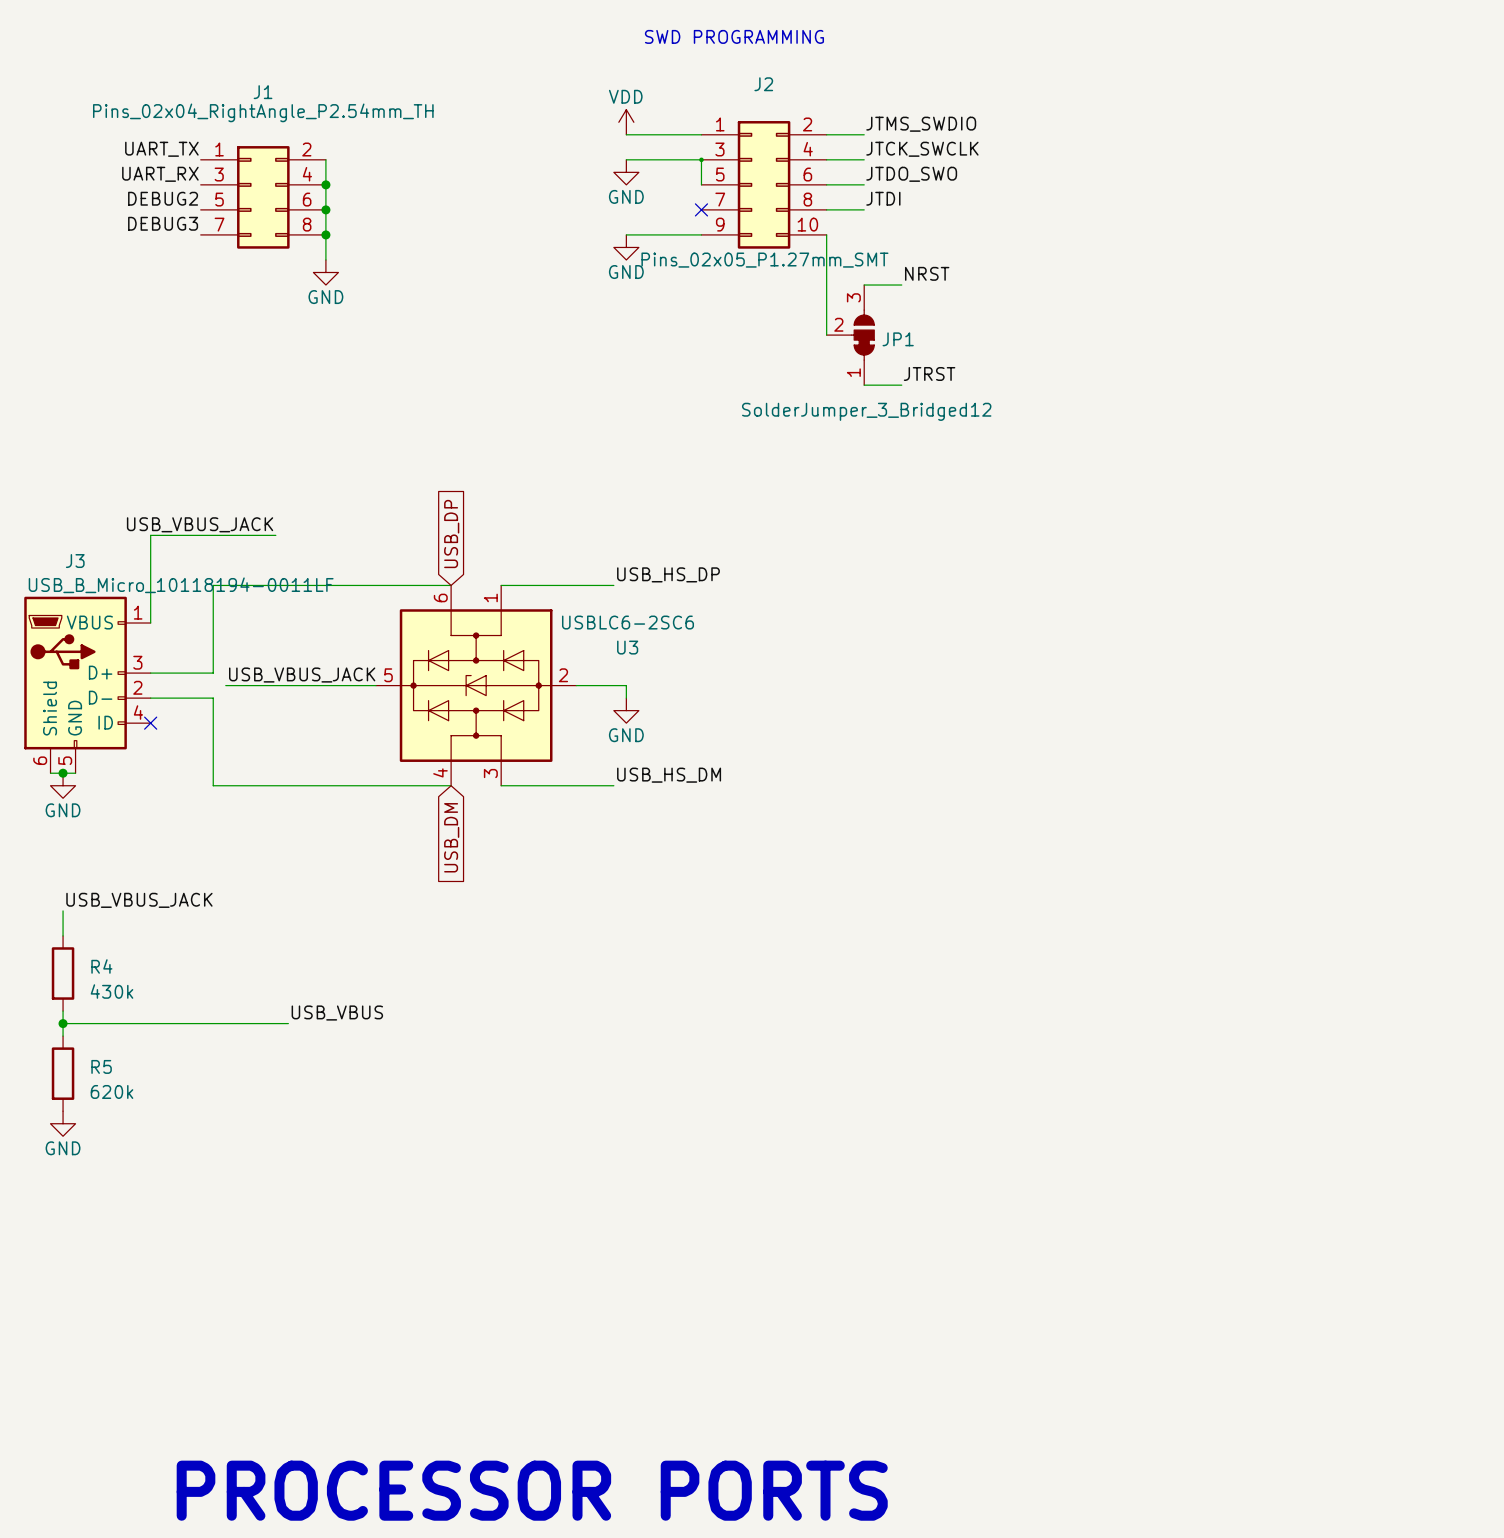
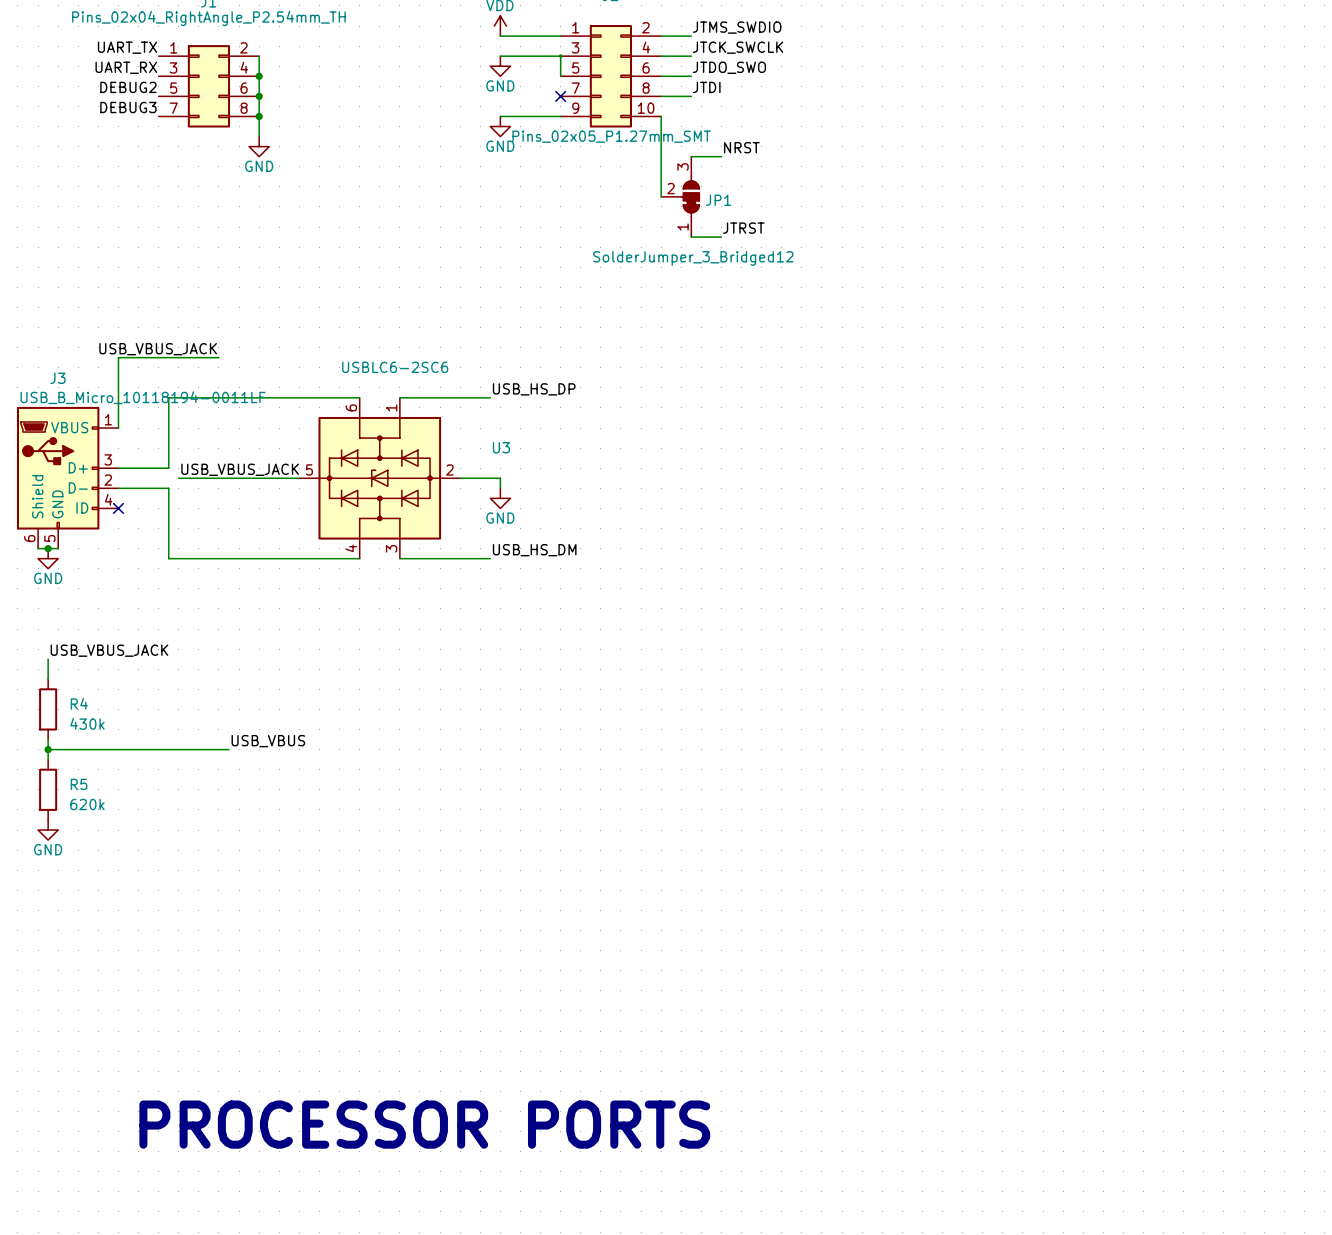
global label: USB_DP (451, 534) -> none
U3 value position: USBLC6-2SC6 (628, 622) -> USBLC6-2SC6 (395, 367)
global label: USB_DM (451, 837) -> none

